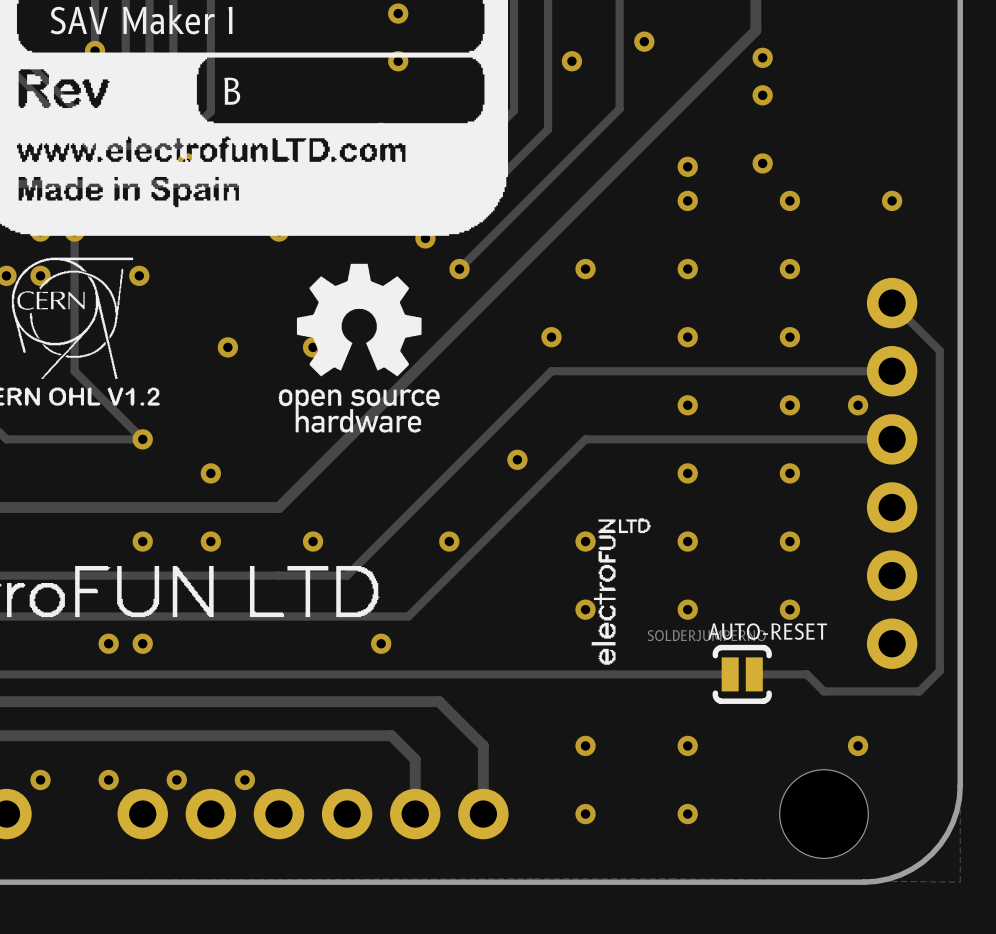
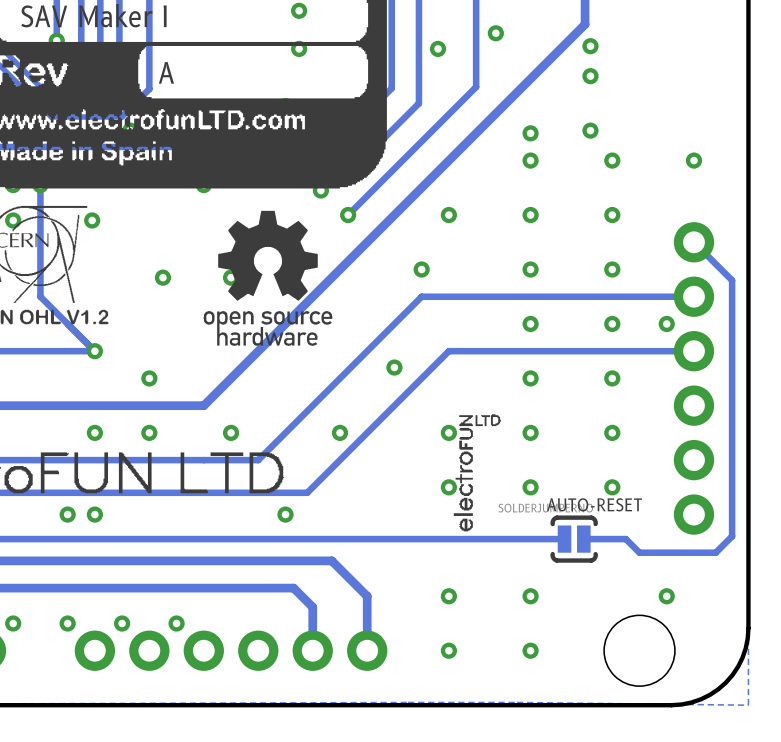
B name: B (232, 91) -> A (166, 72)

